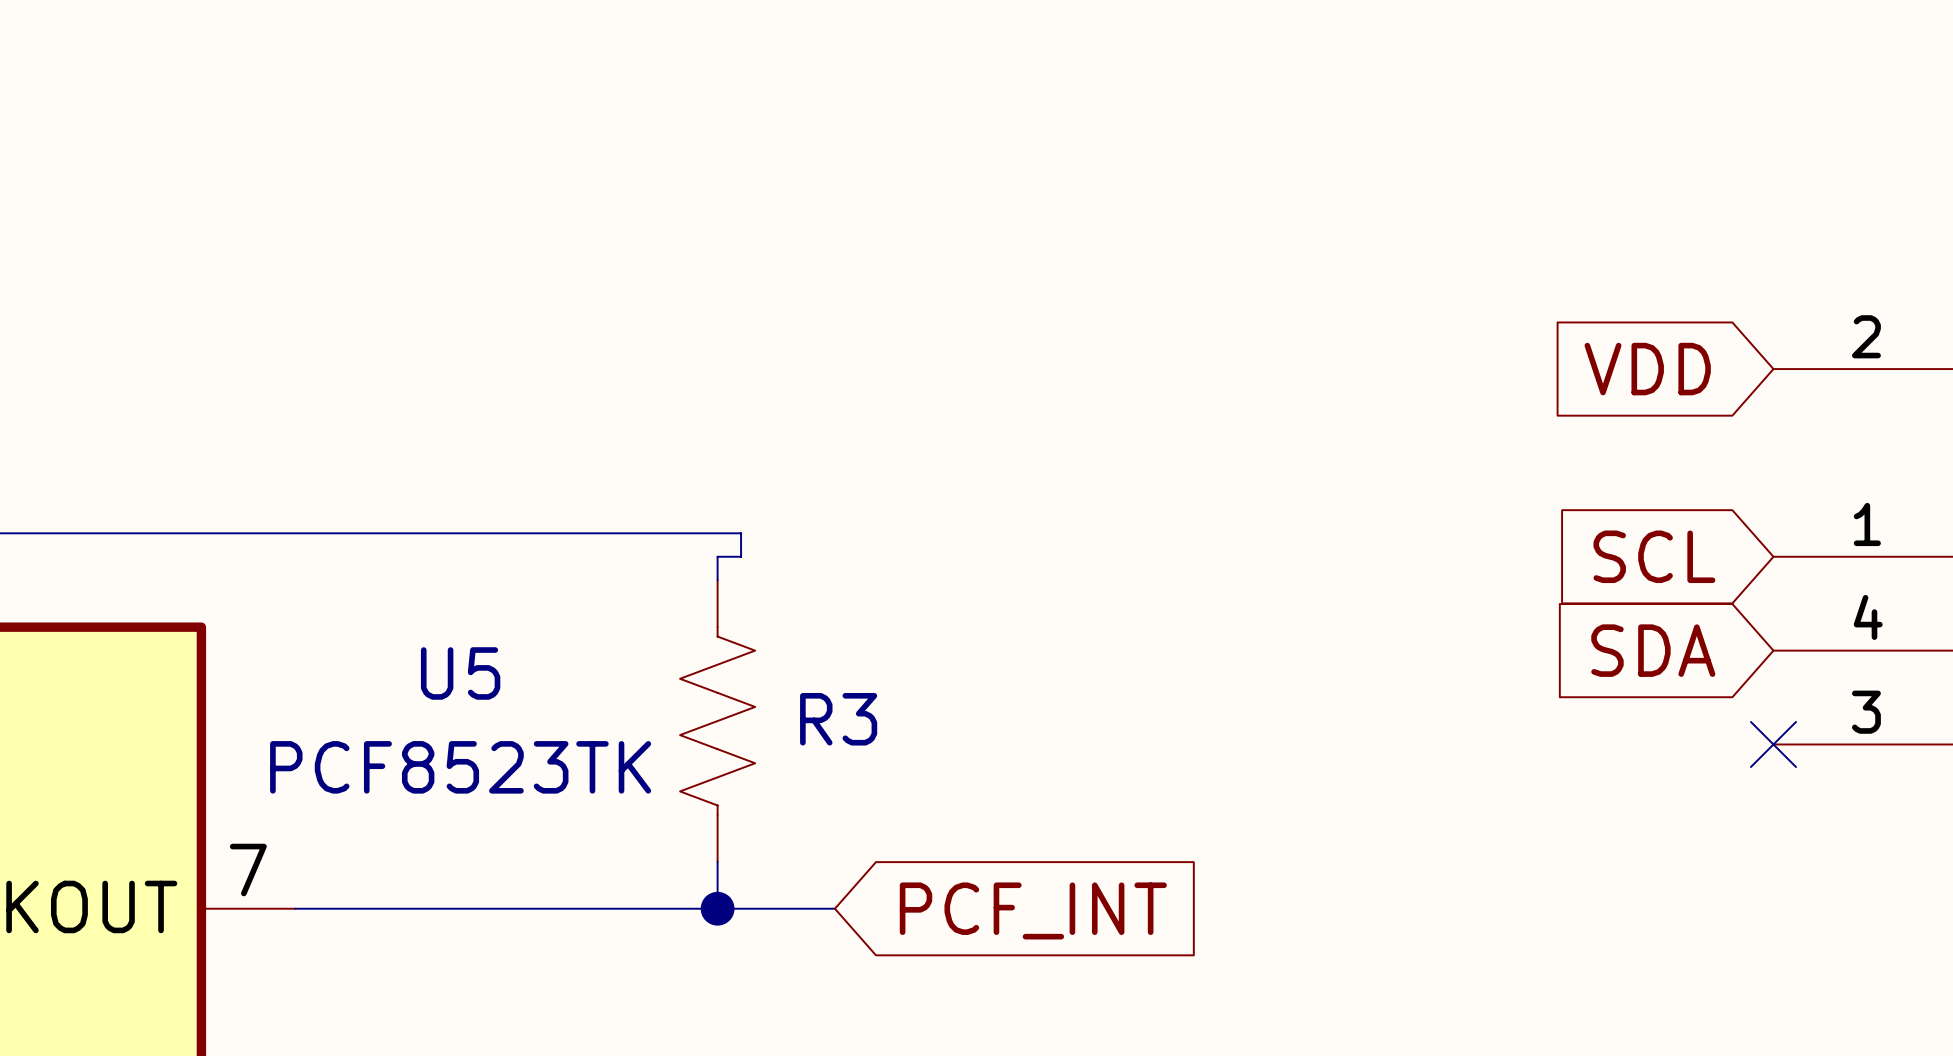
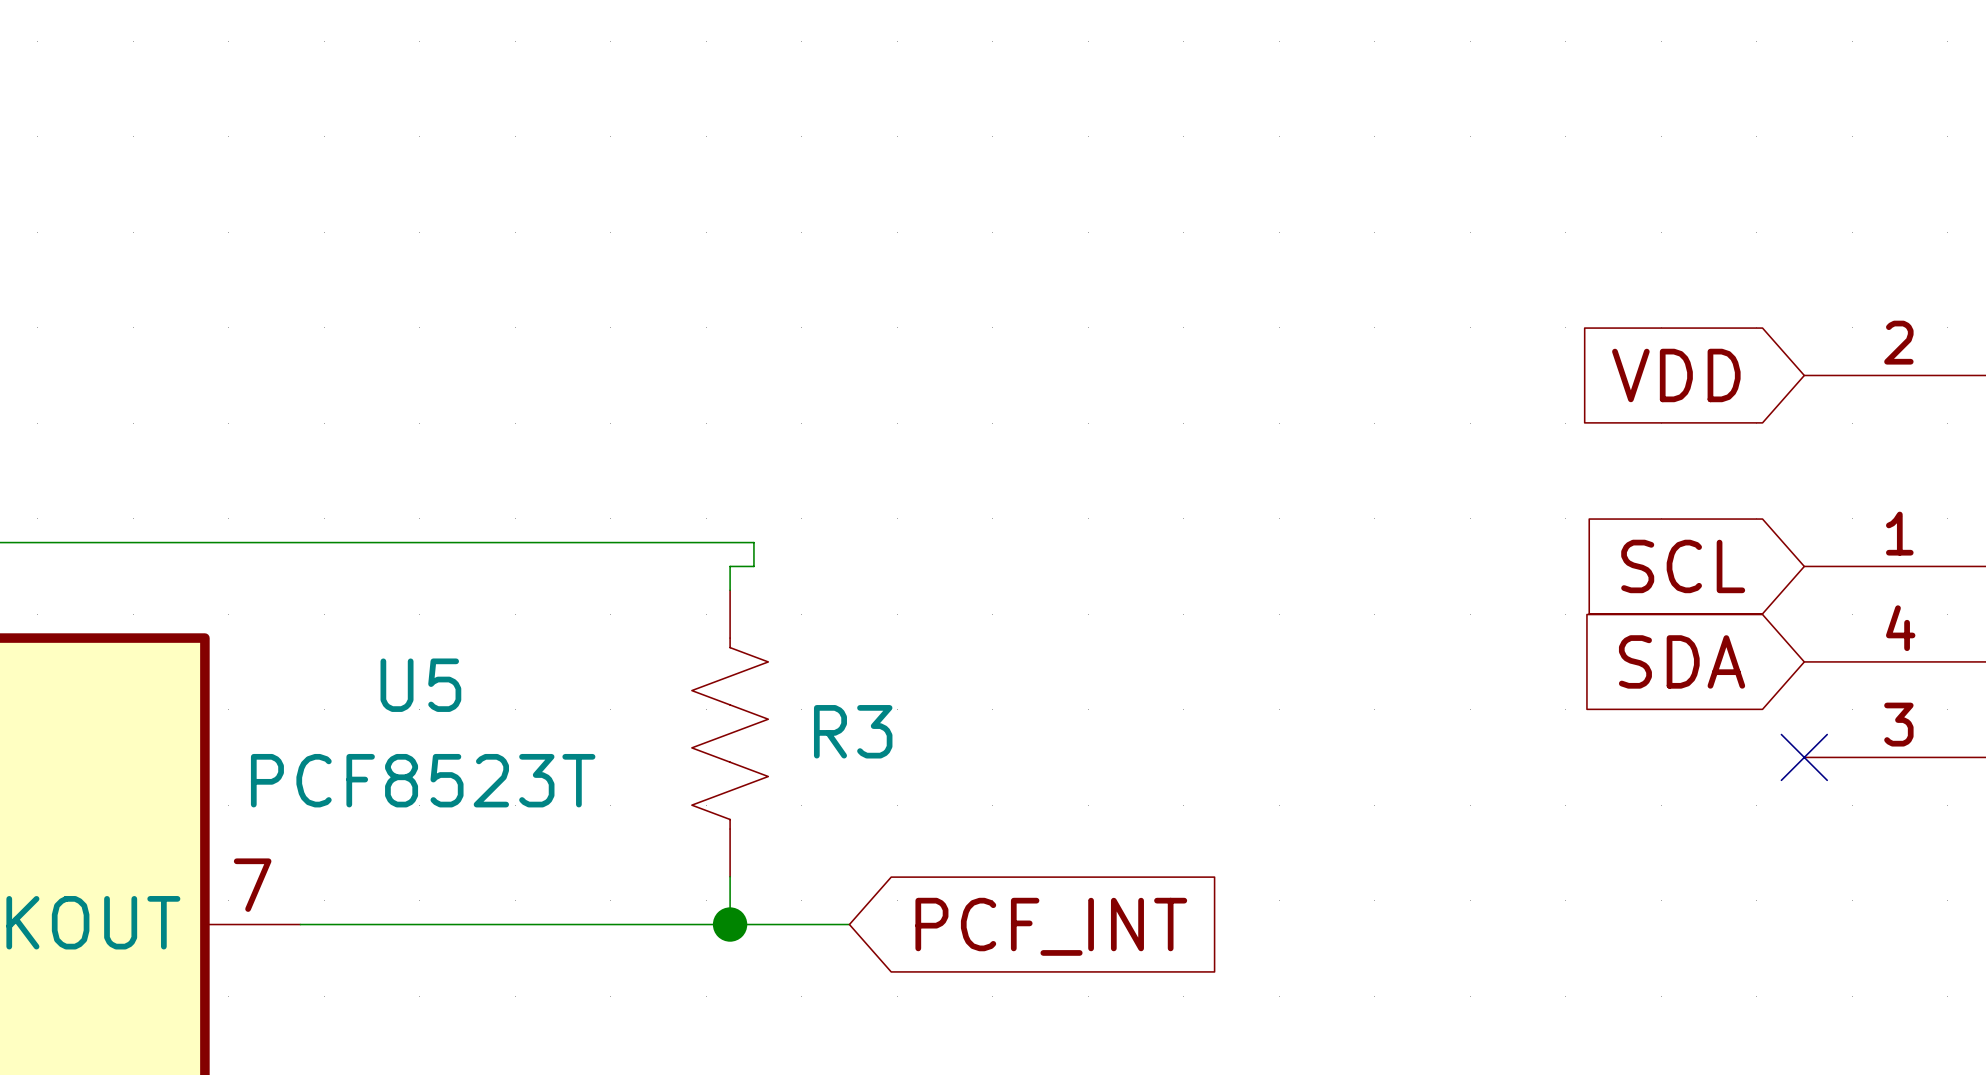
U5 name position: U5 (460, 673) -> U5 (420, 685)
U5 value: PCF8523TK (460, 767) -> PCF8523T (423, 780)

